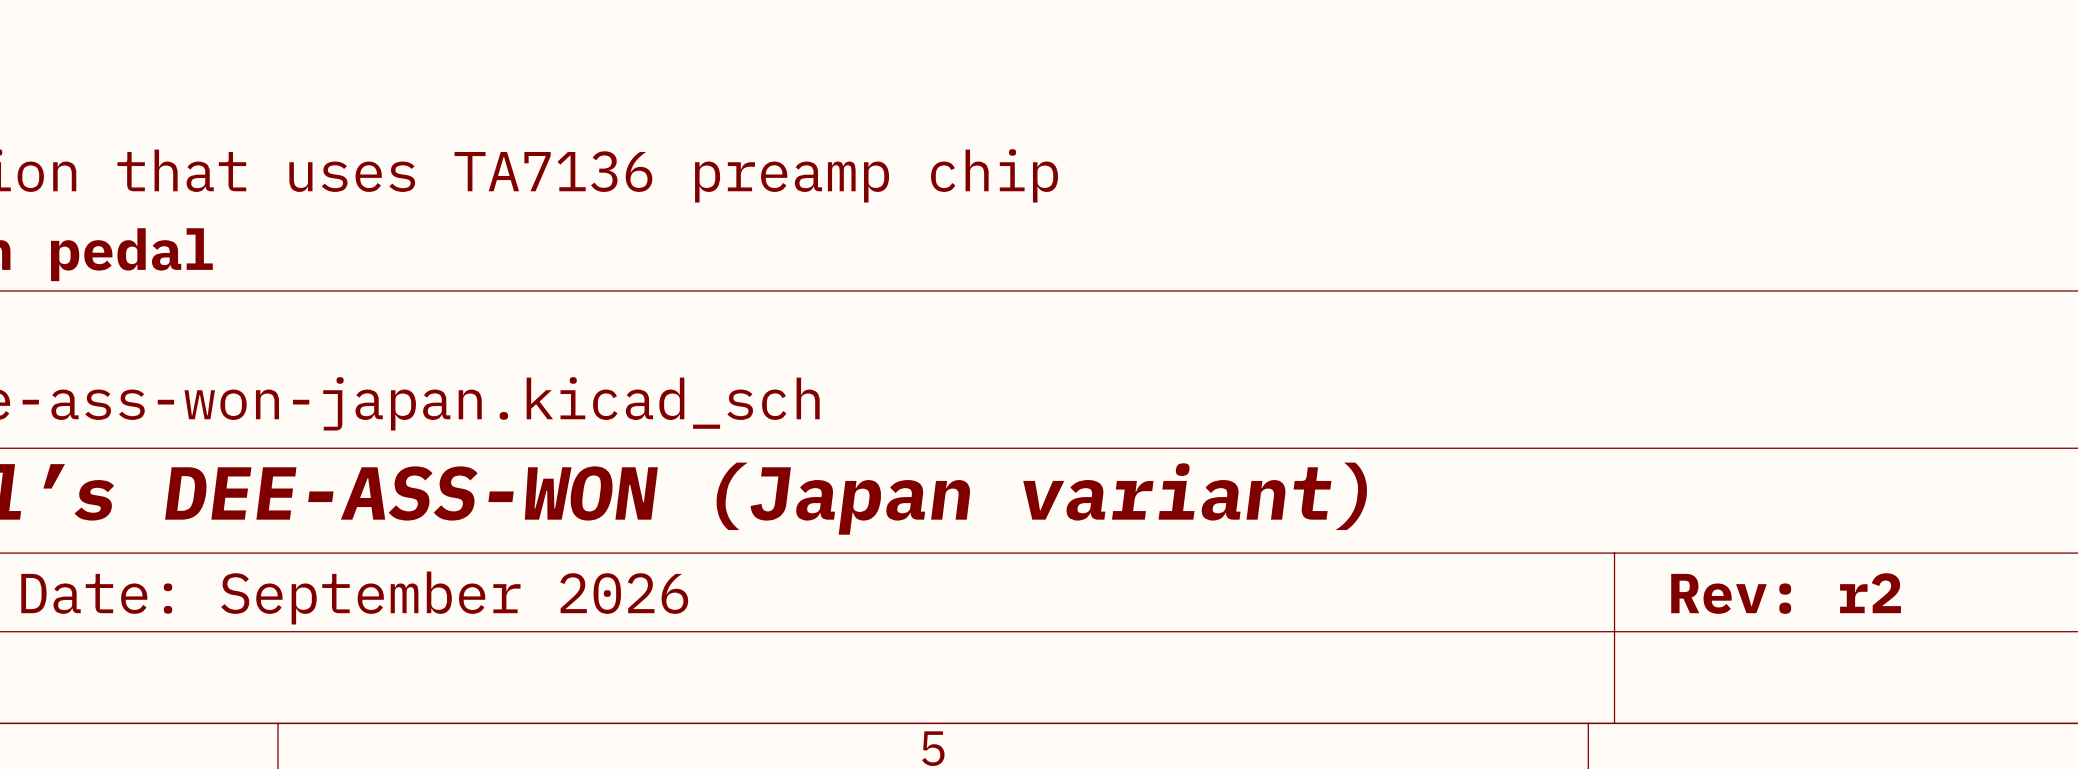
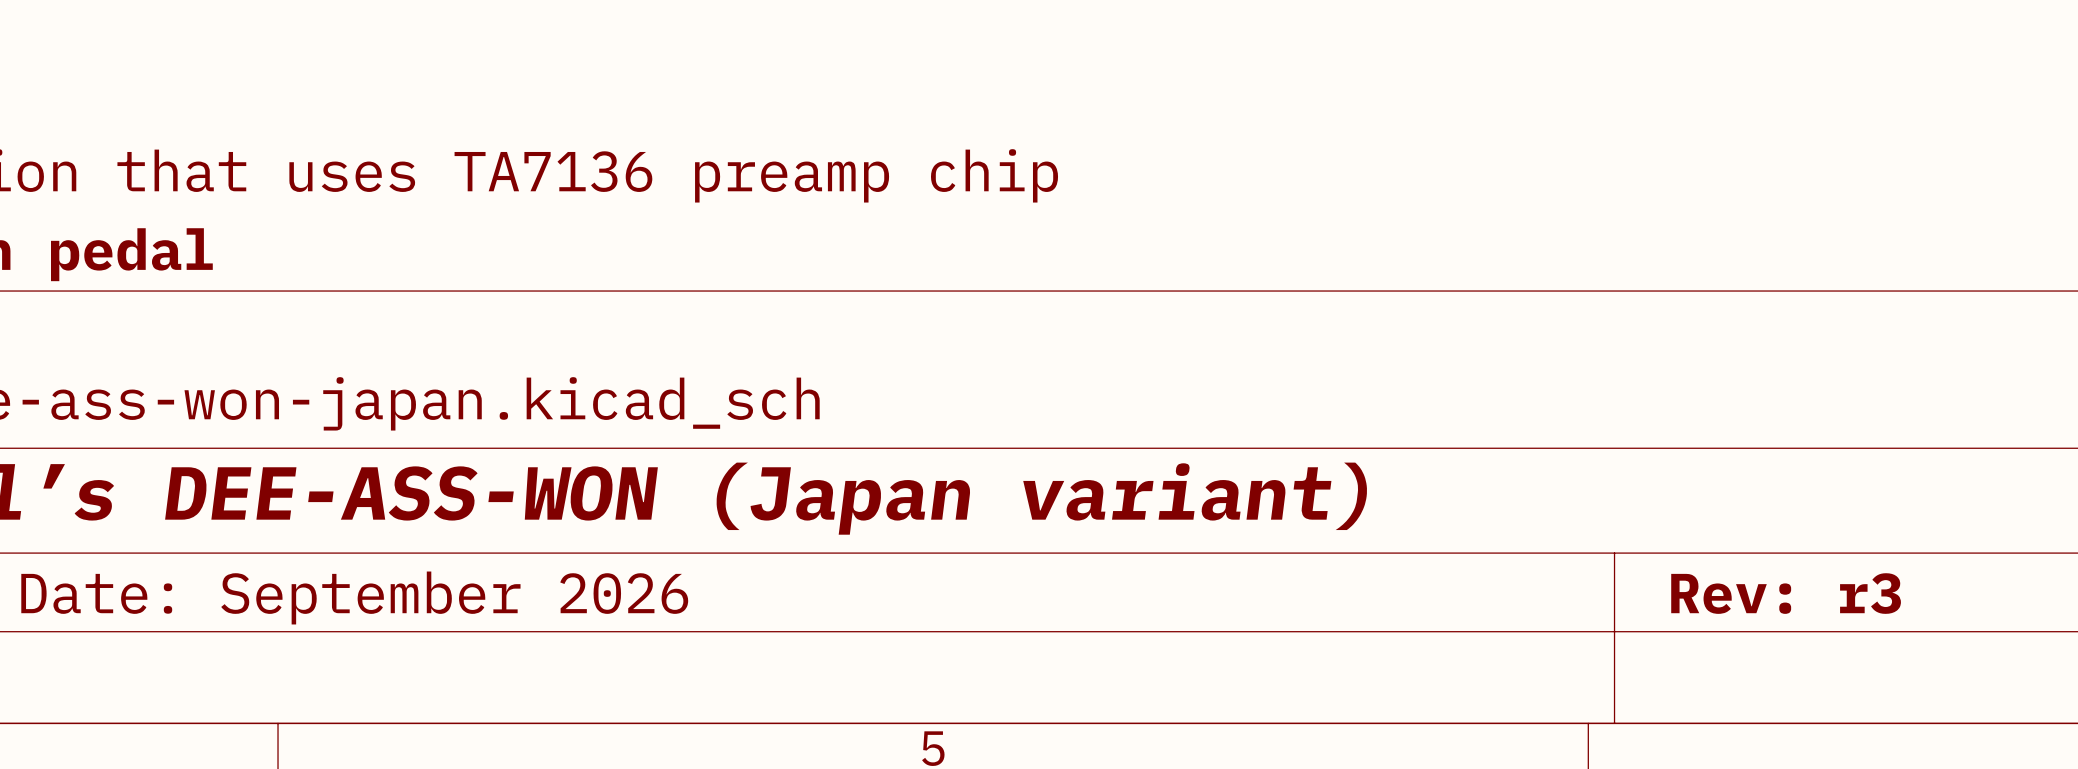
title block: Rev: r2 (1786, 593) -> Rev: r3 (1786, 593)

